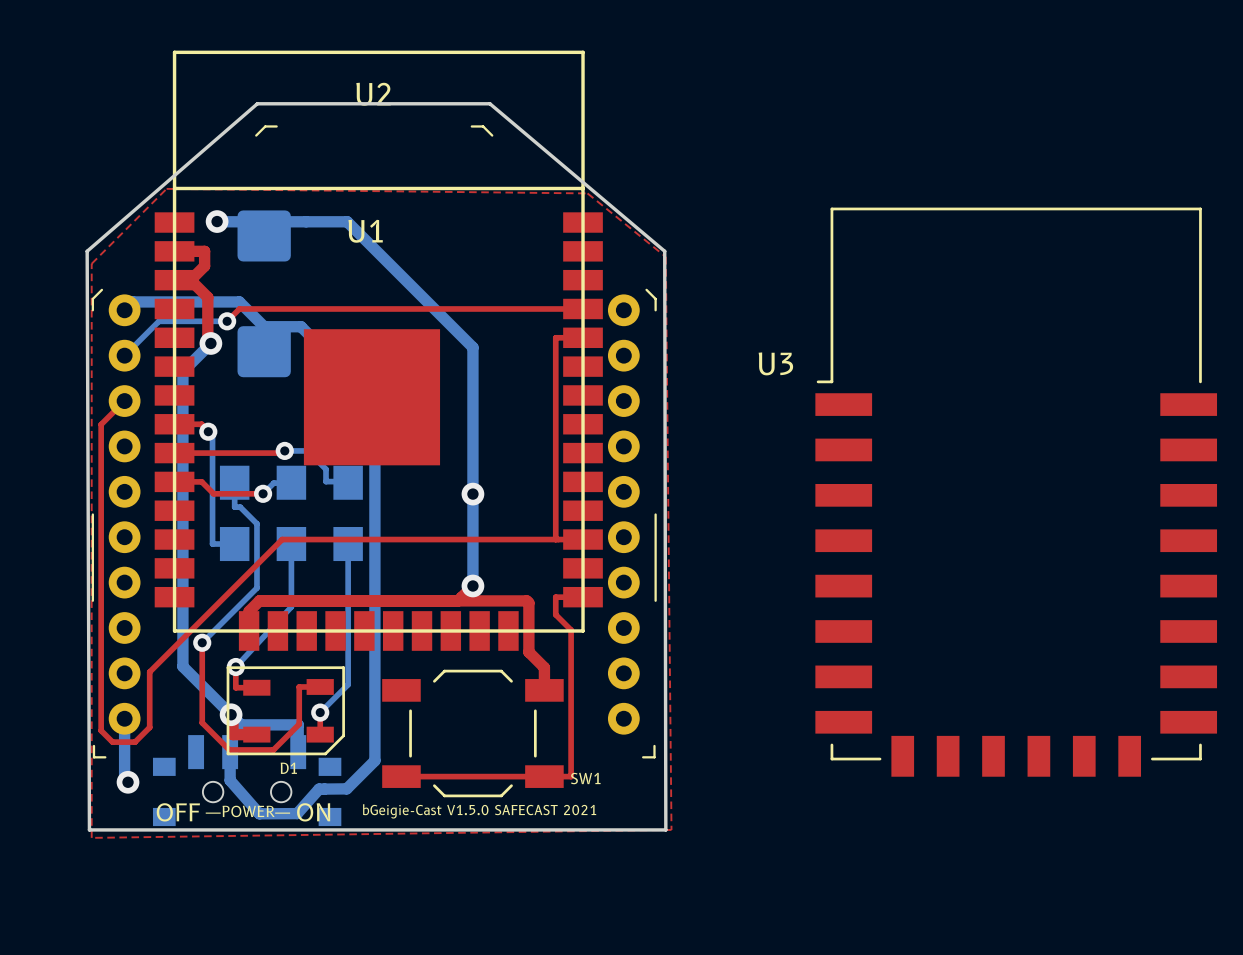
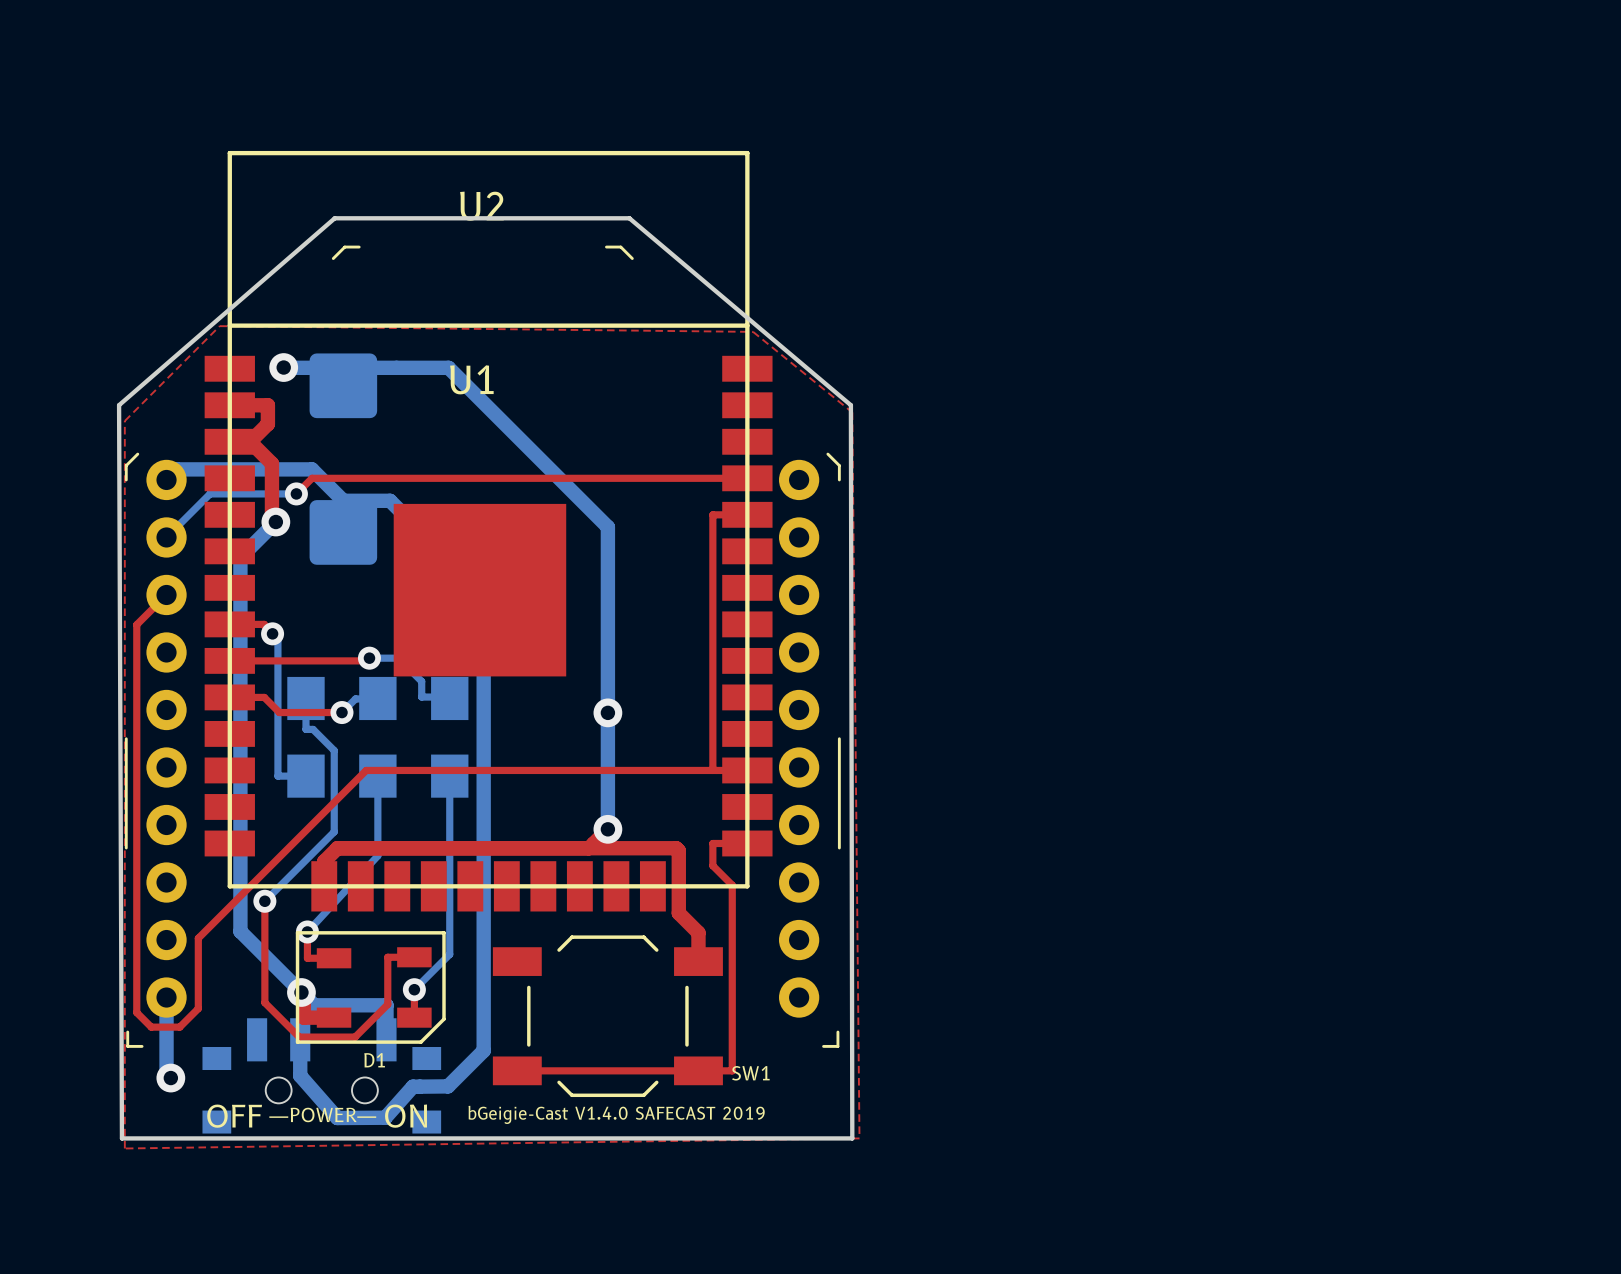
U3: (1016, 492) -> none
text: bGeigie-Cast V1.5.0 SAFECAST 2021 (479, 811) -> bGeigie-Cast V1.4.0 SAFECAST 2019 (616, 1114)

